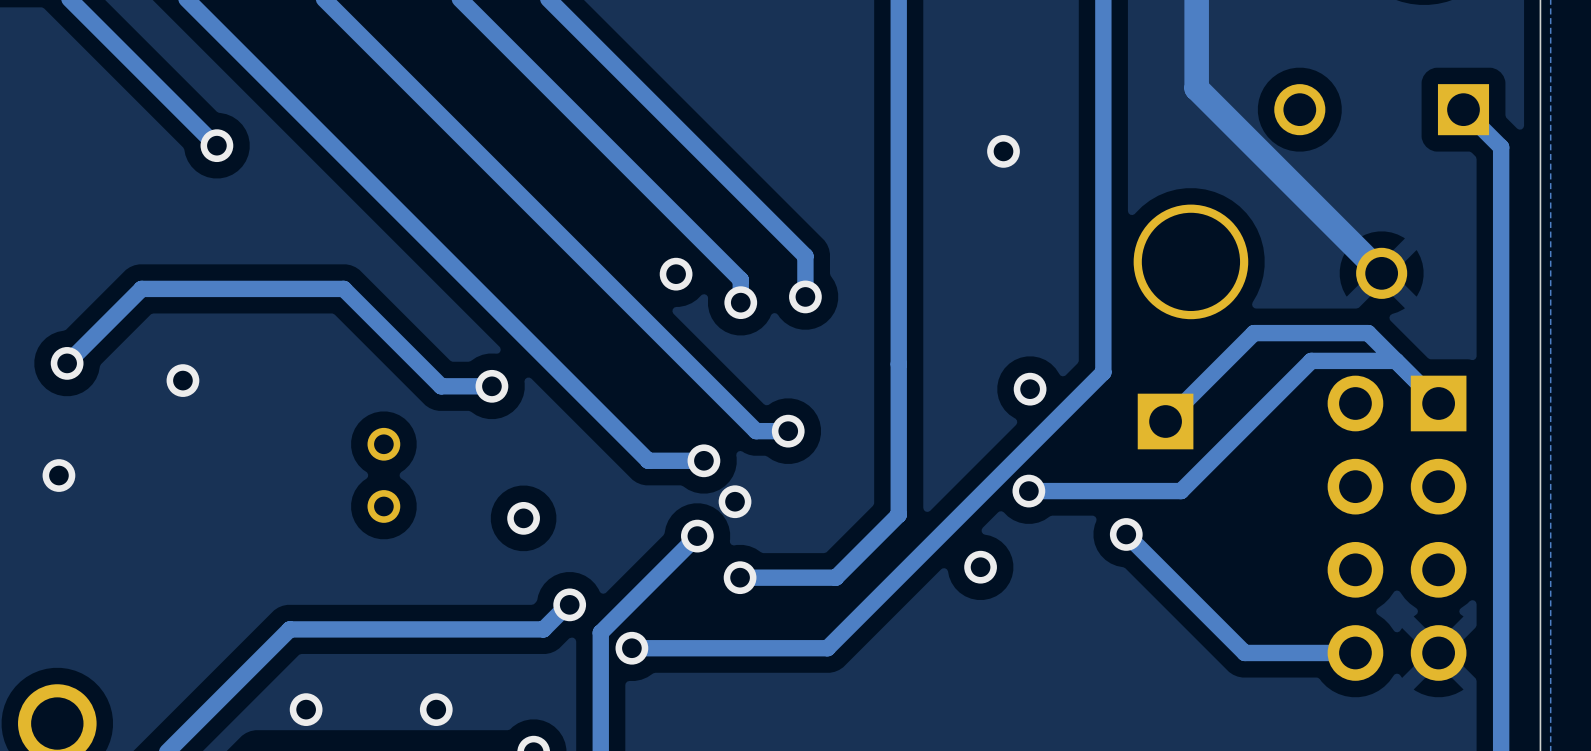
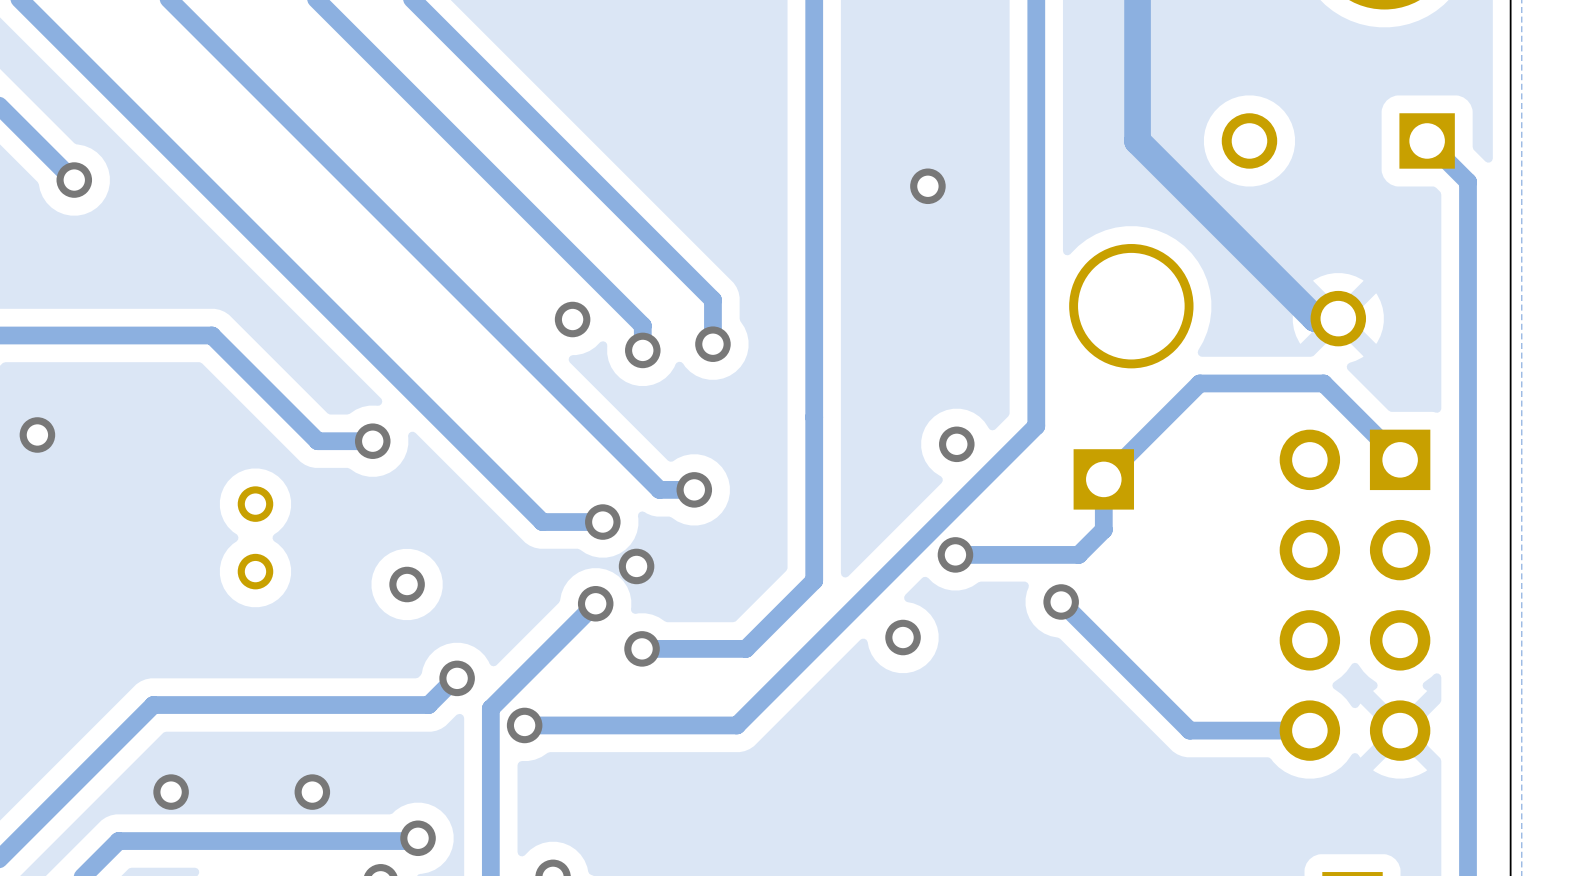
track: (1196, 88) (1381, 273) -> (1137, 117) (1137, 141) (1315, 318) (1338, 318)
track: (1396, 360) (1311, 360) (1181, 491) (1142, 491) -> (1103, 479) (1103, 529) (1078, 554)

